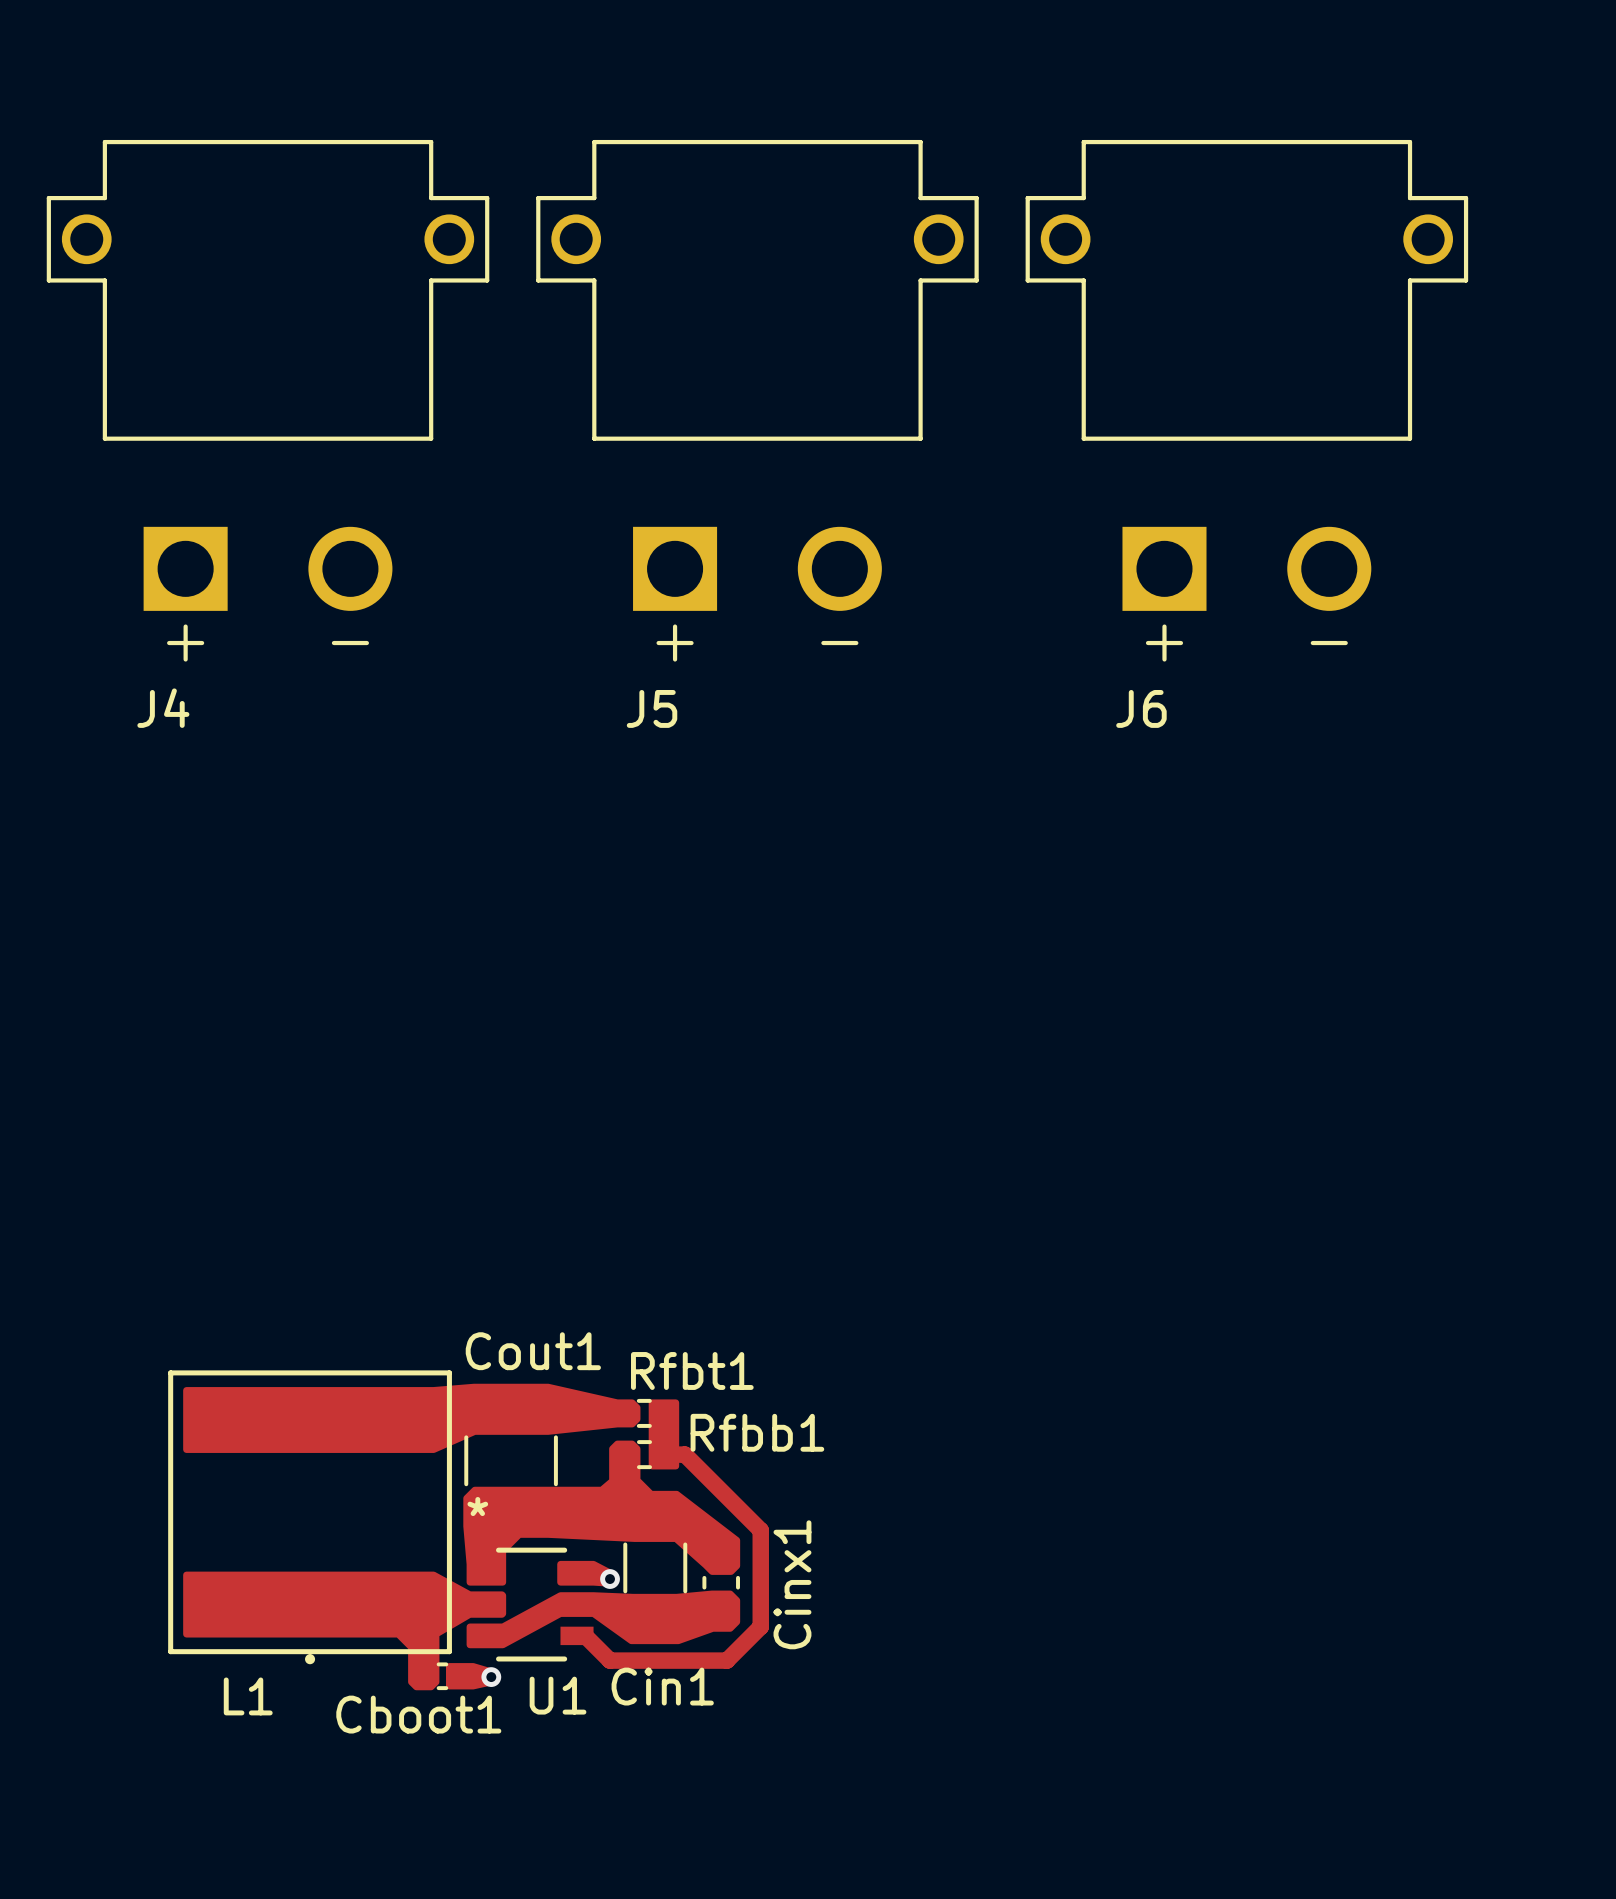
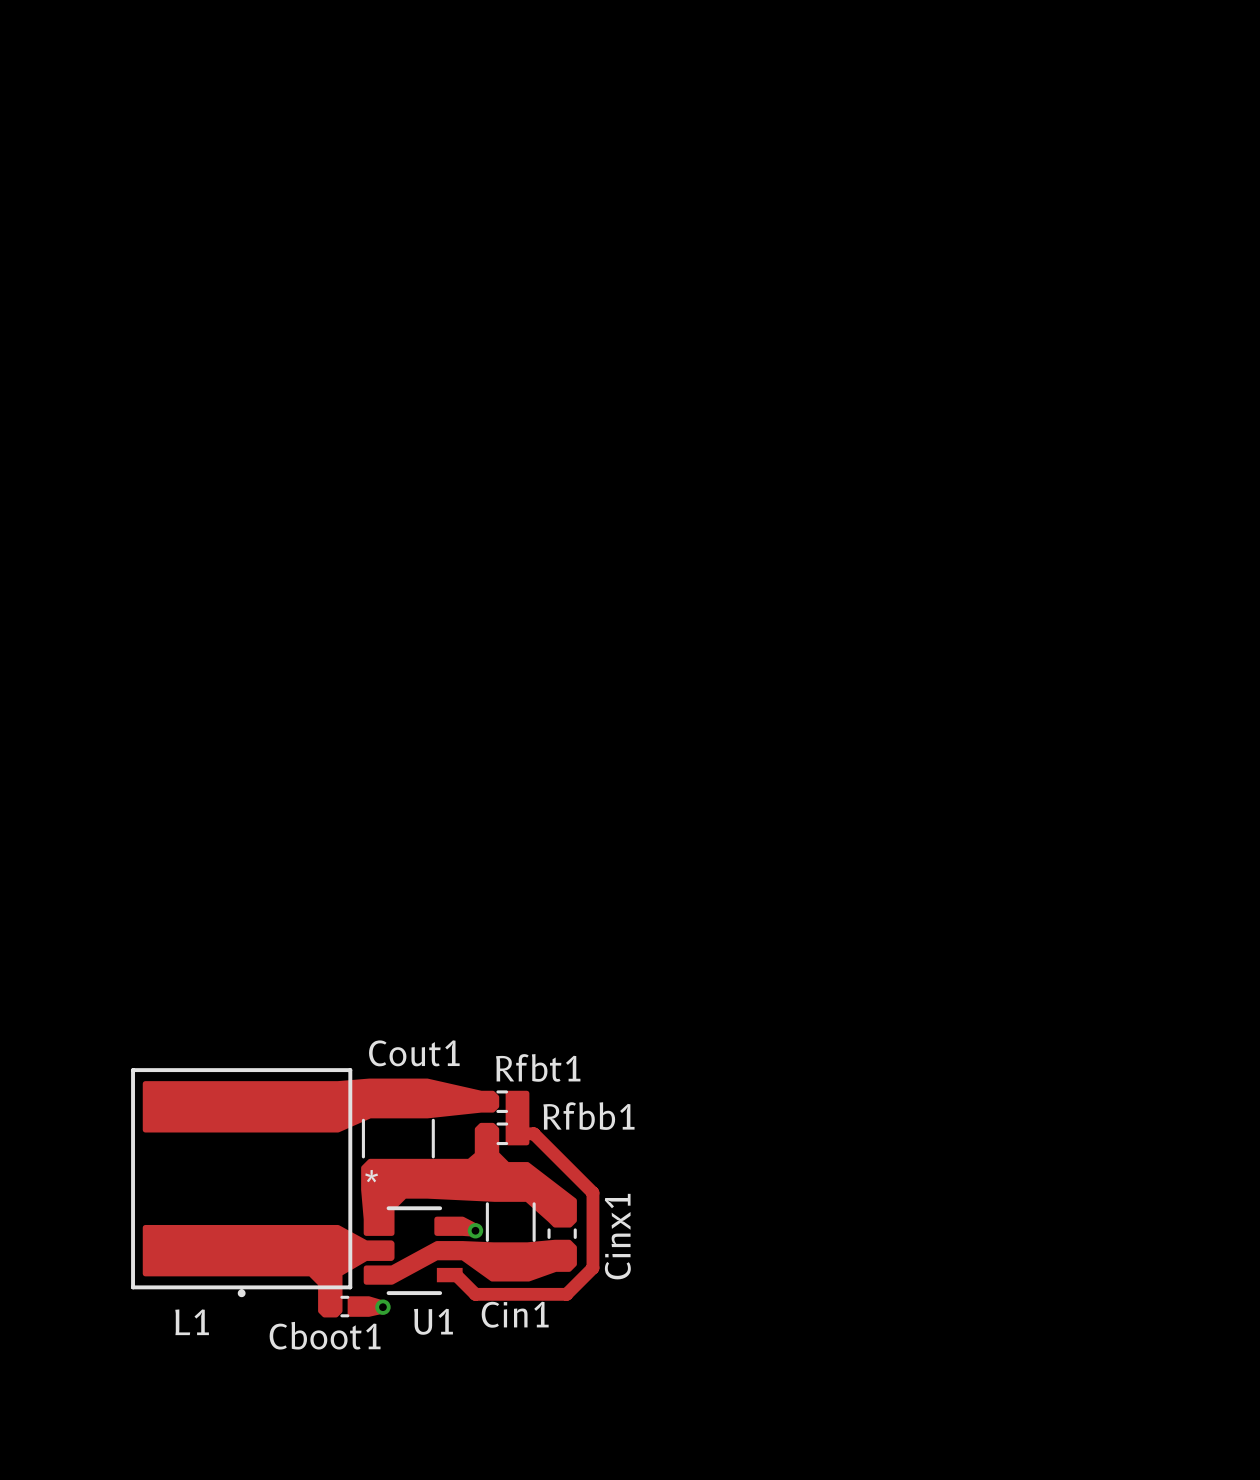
J4: (268, 400) -> none
J5: (757, 400) -> none
J6: (1246, 400) -> none

